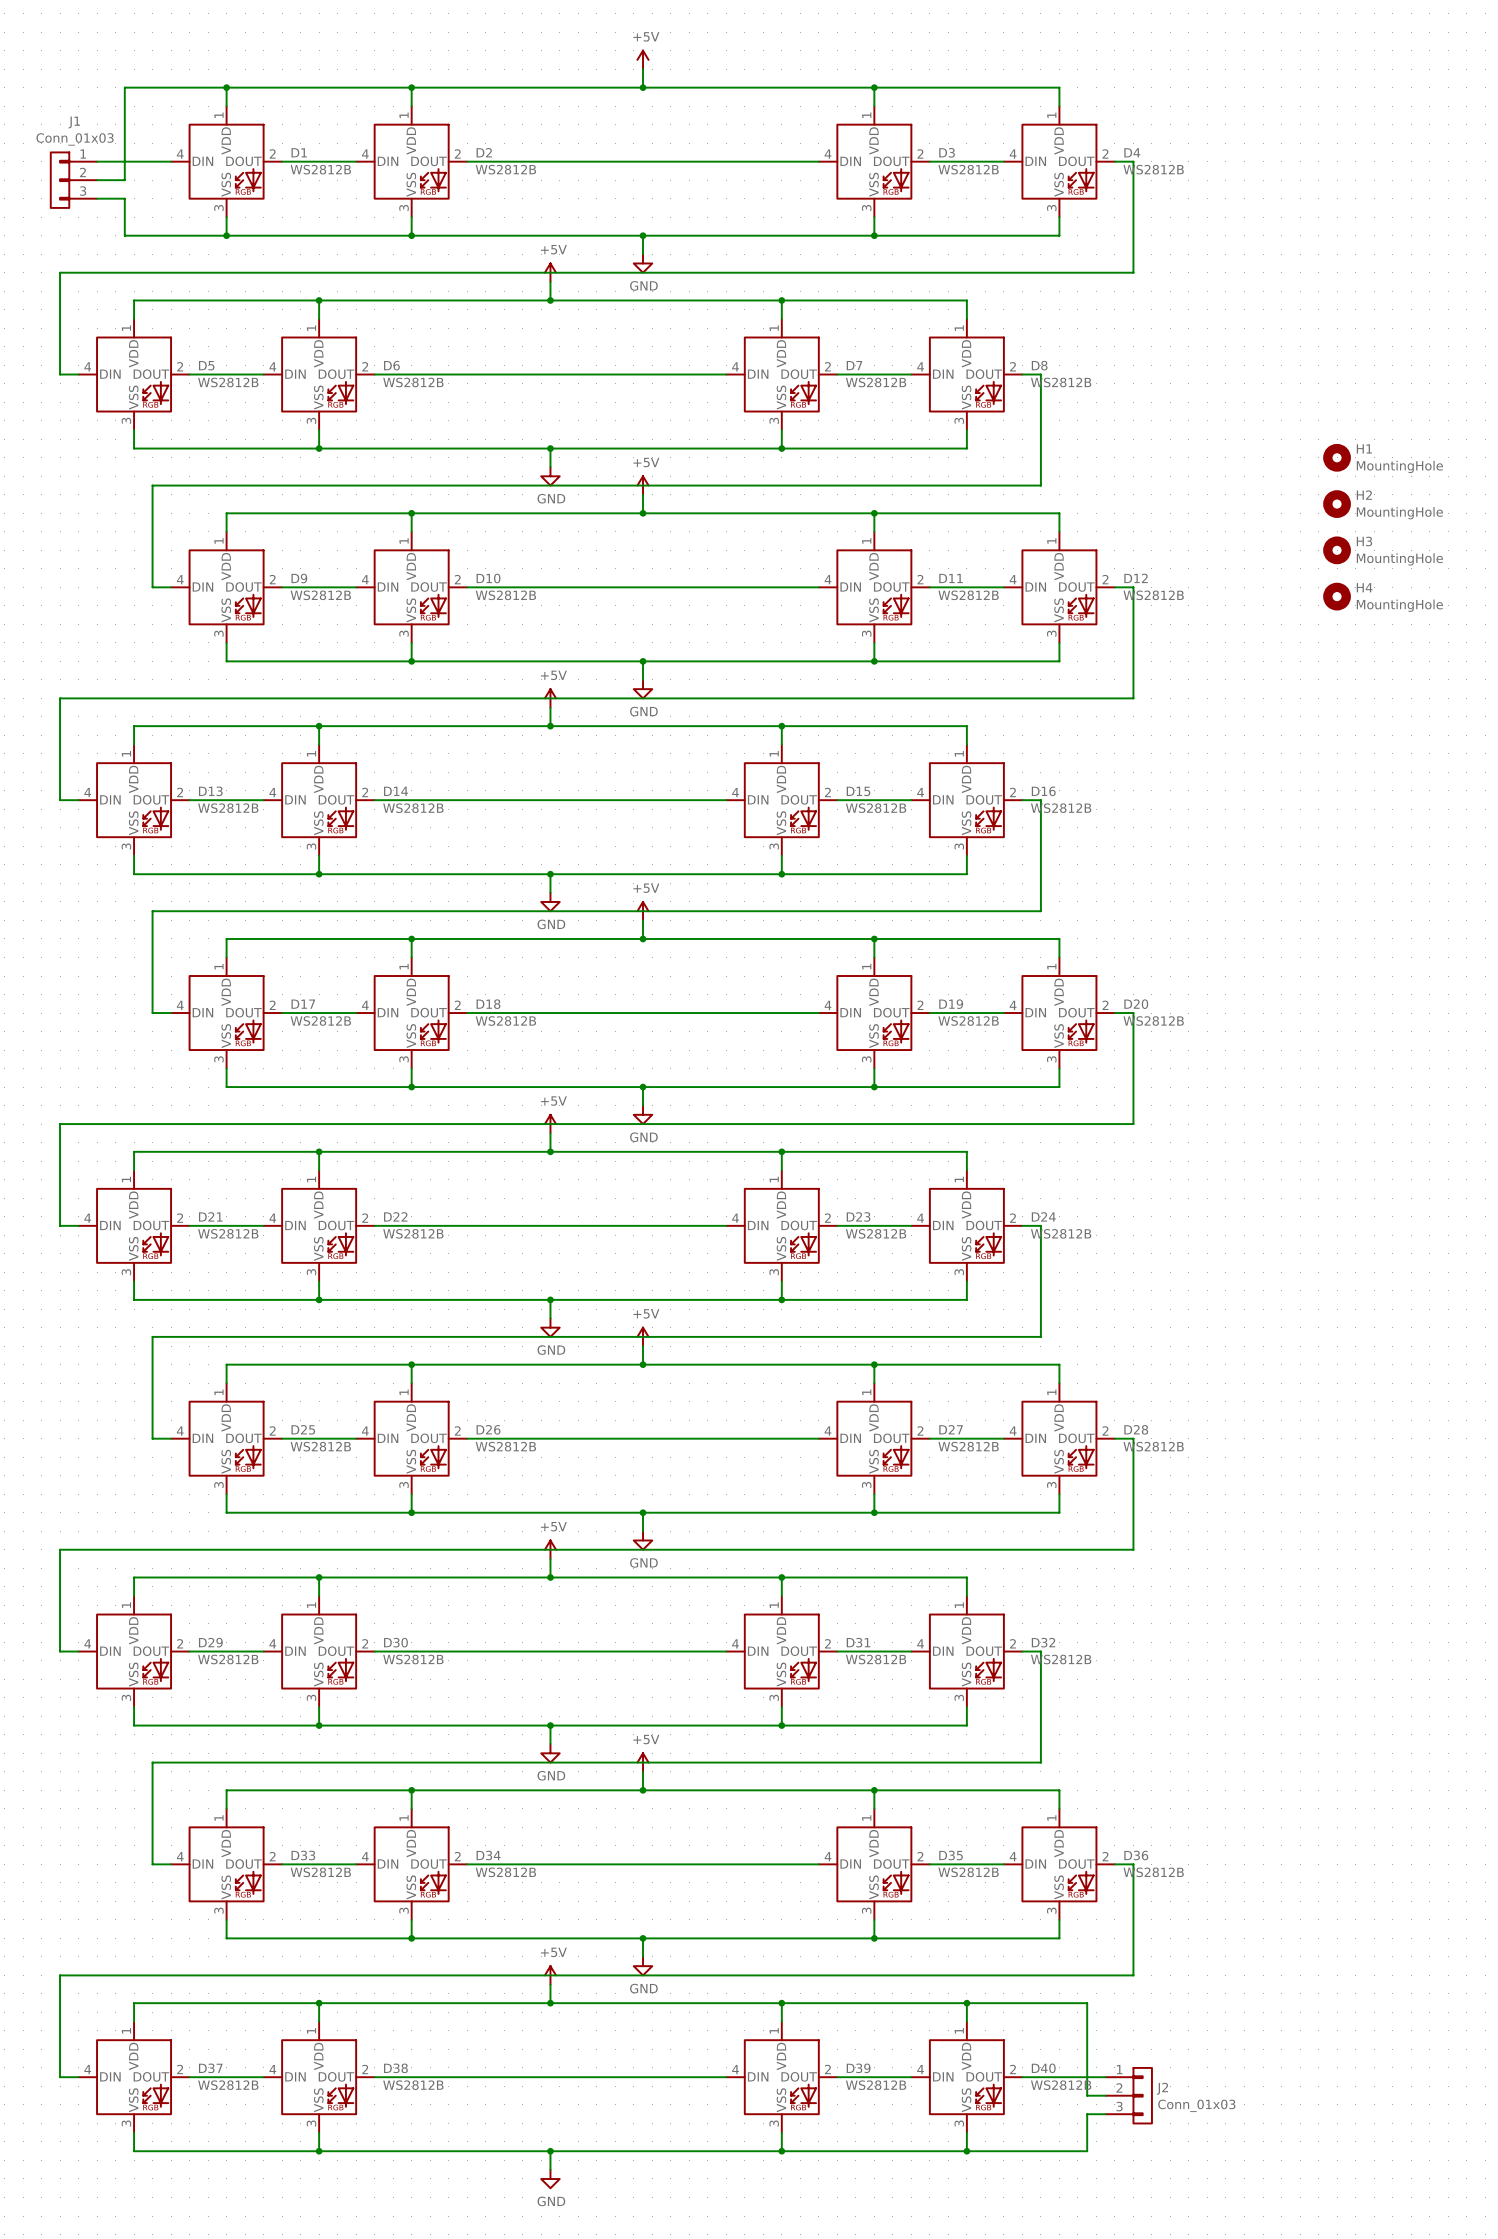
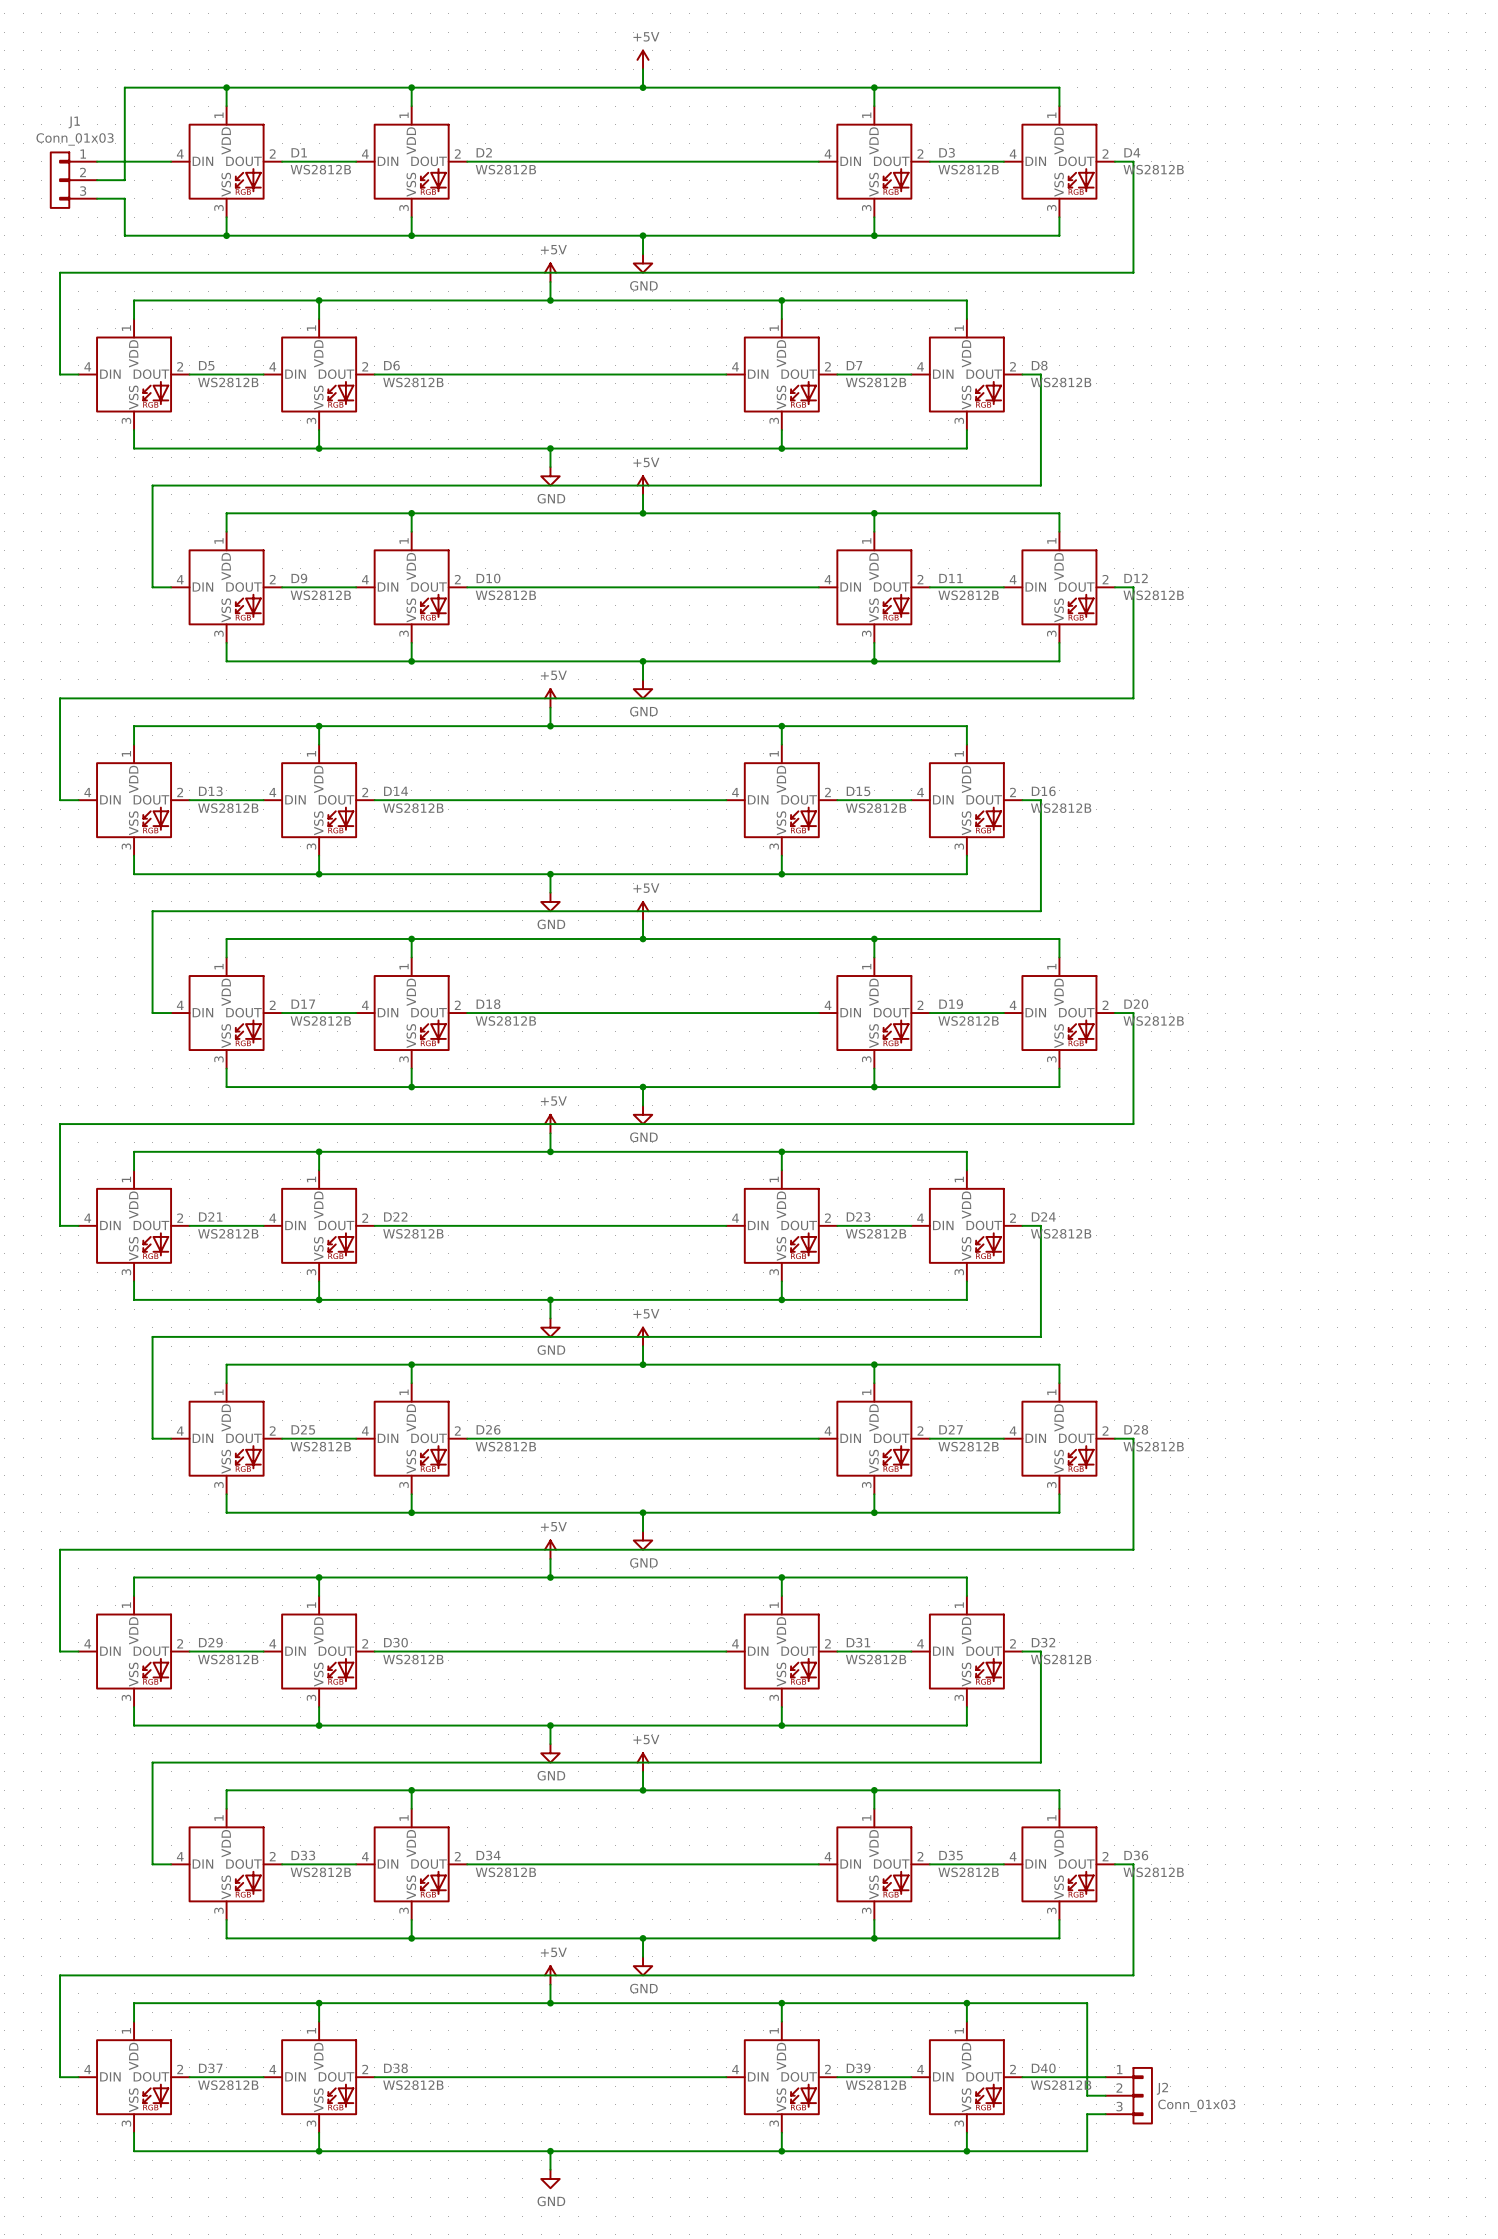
H1: MountingHole (1337, 457) -> none
H2: MountingHole (1337, 504) -> none
H3: MountingHole (1337, 550) -> none
H4: MountingHole (1337, 596) -> none

